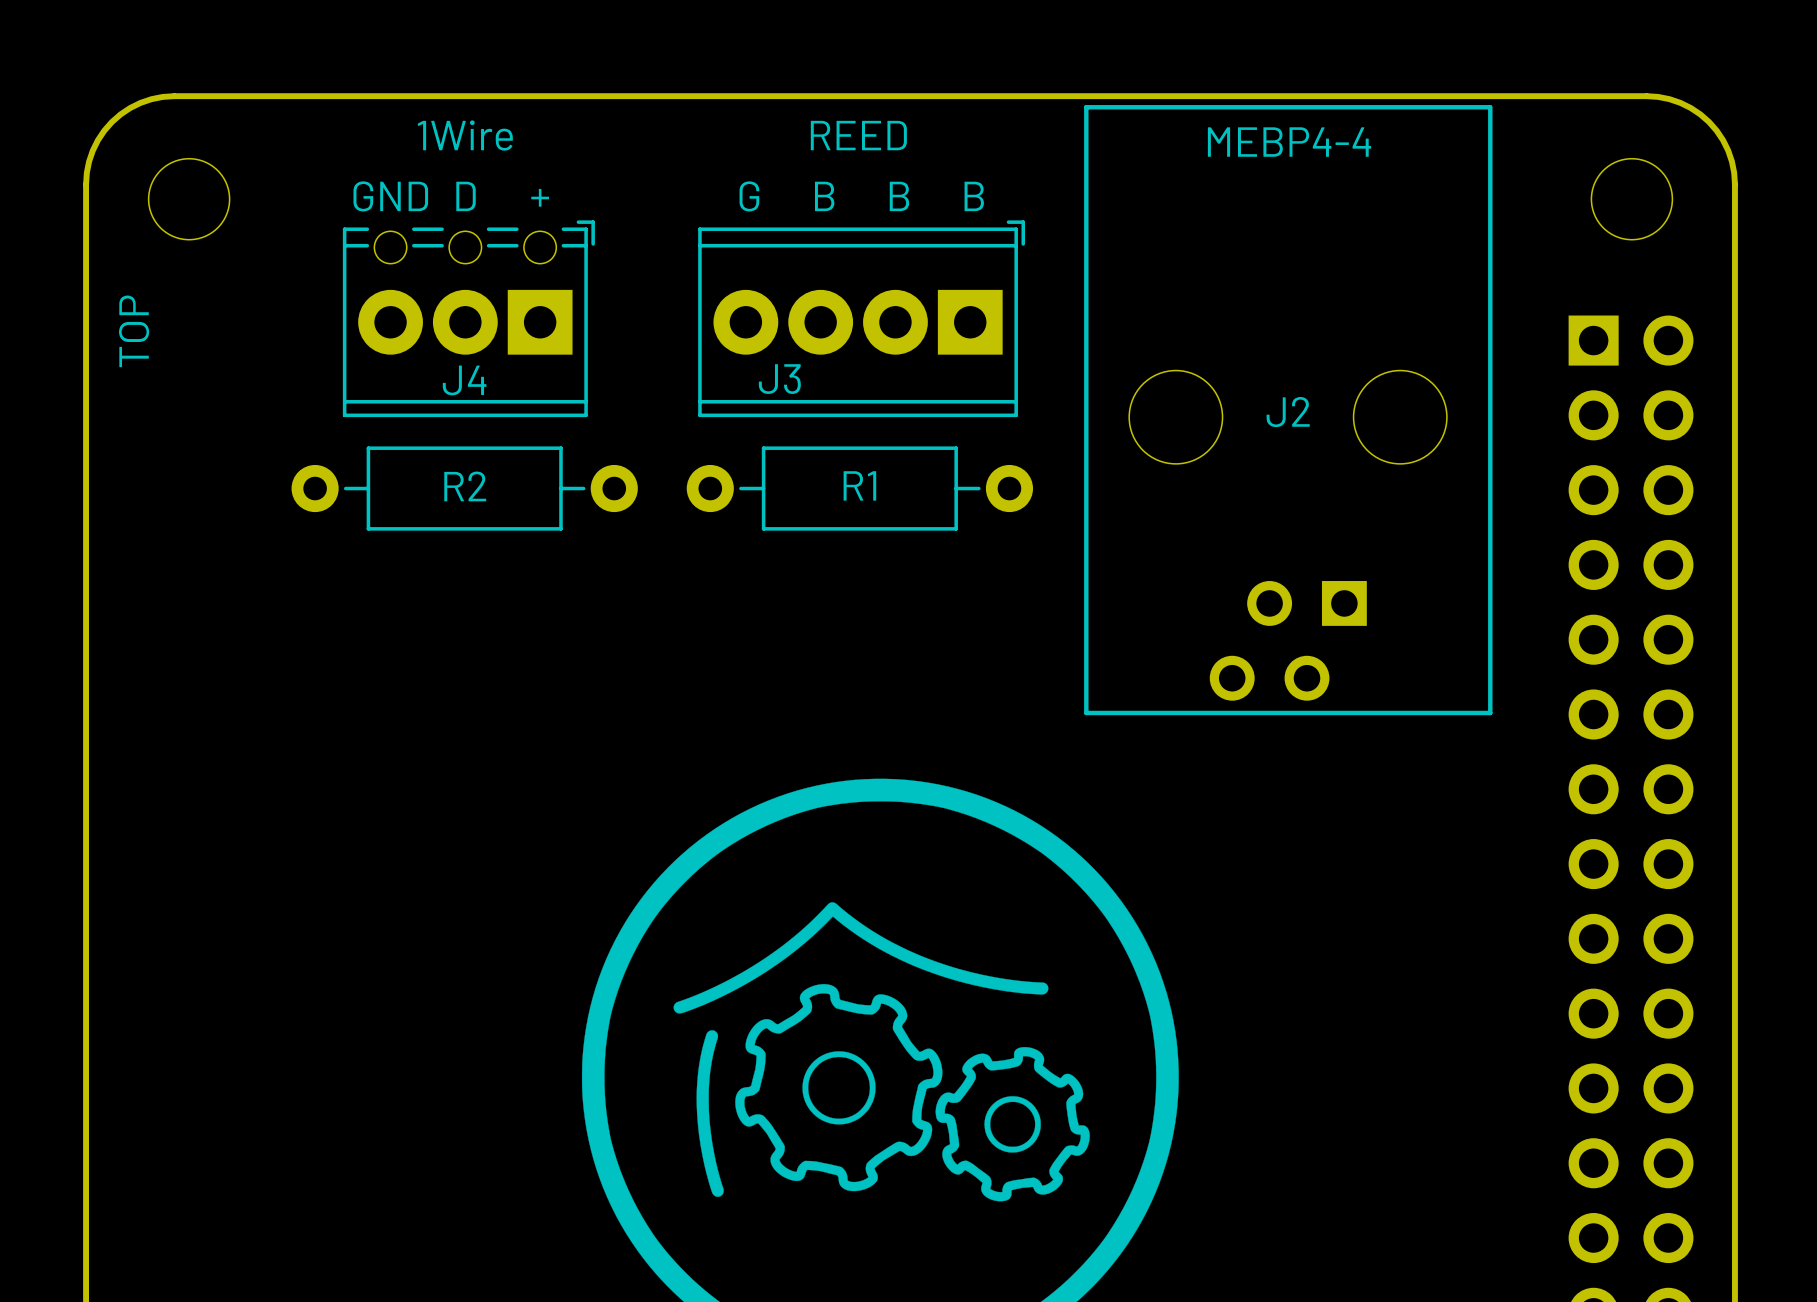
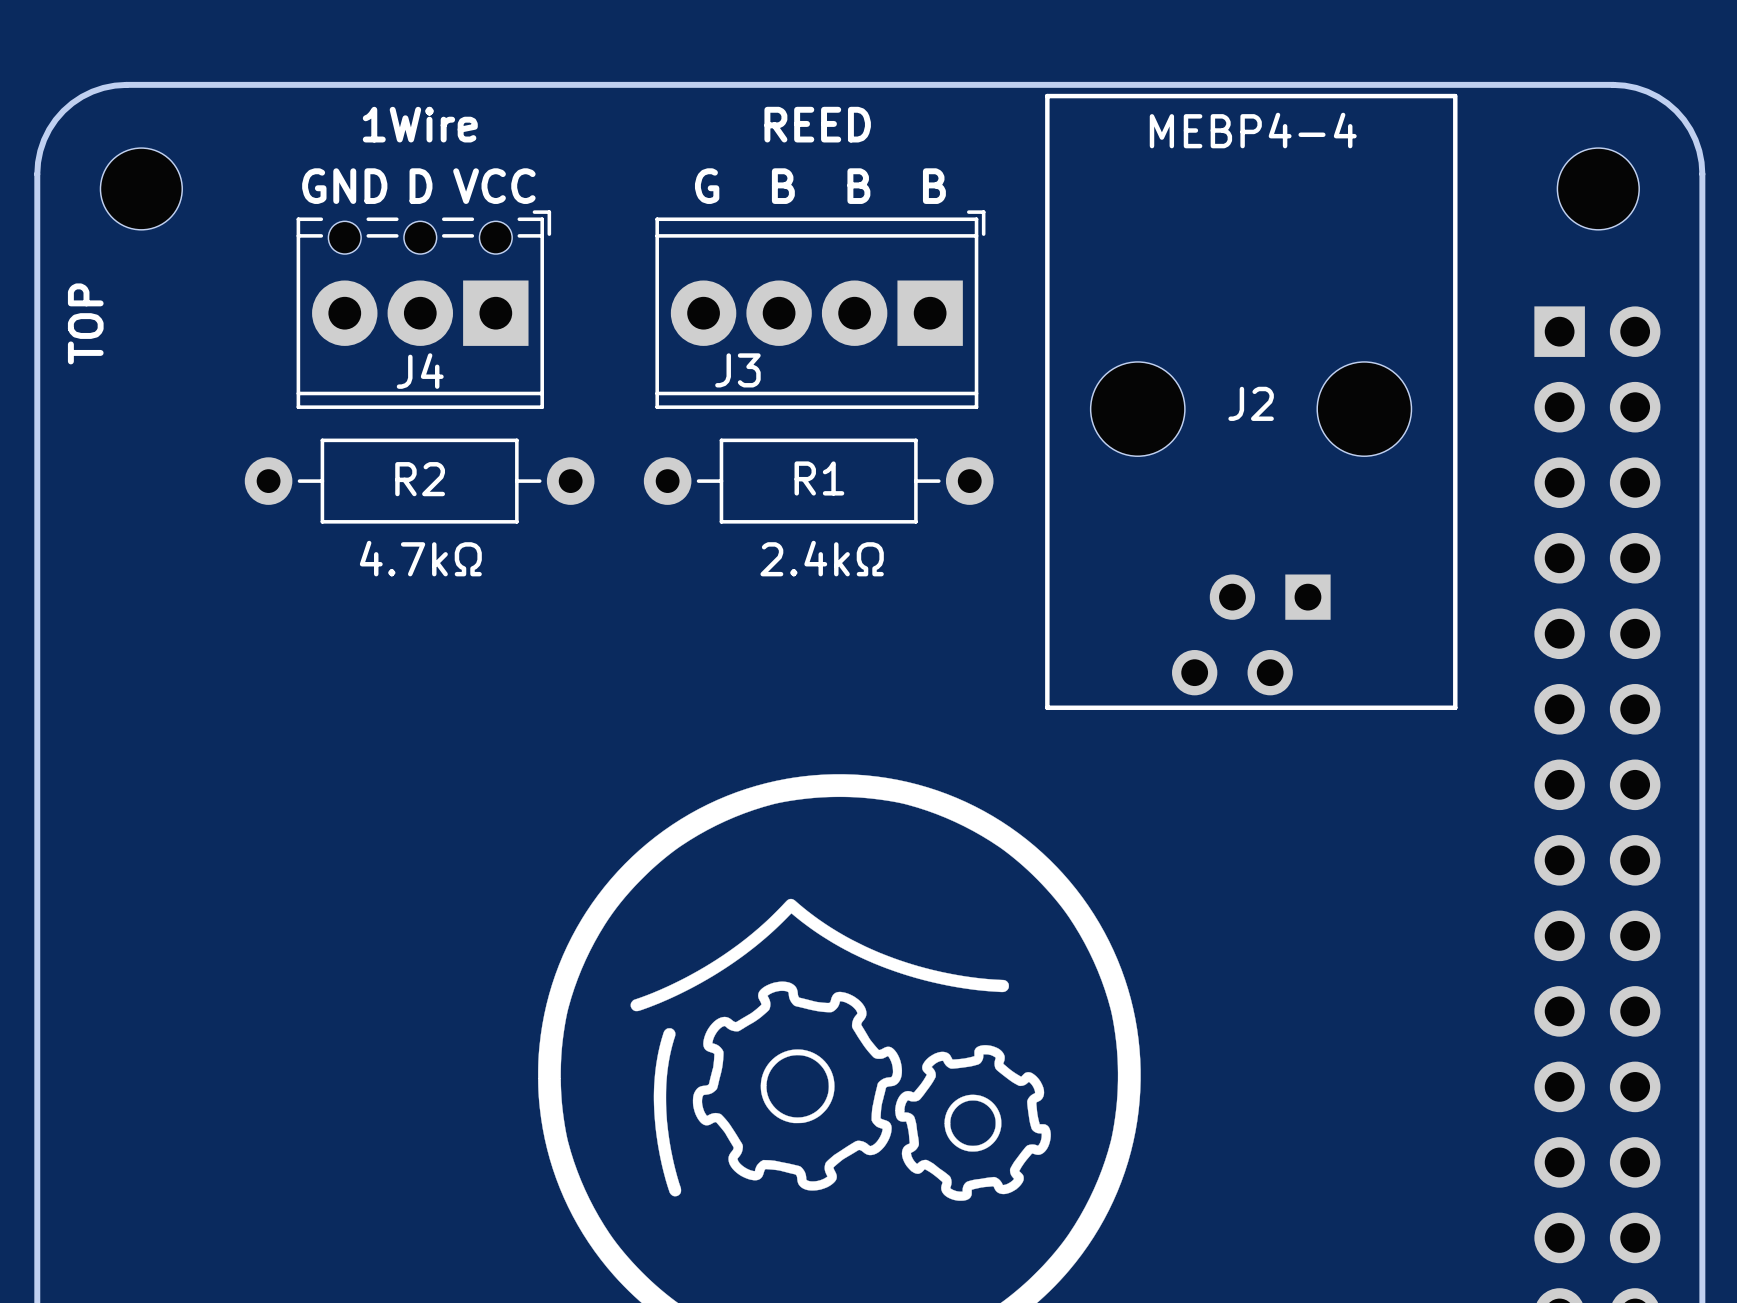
text: + (540, 197) -> VCC (494, 186)
text: none -> 4.7kΩ (420, 558)
text: none -> 2.4kΩ (822, 558)

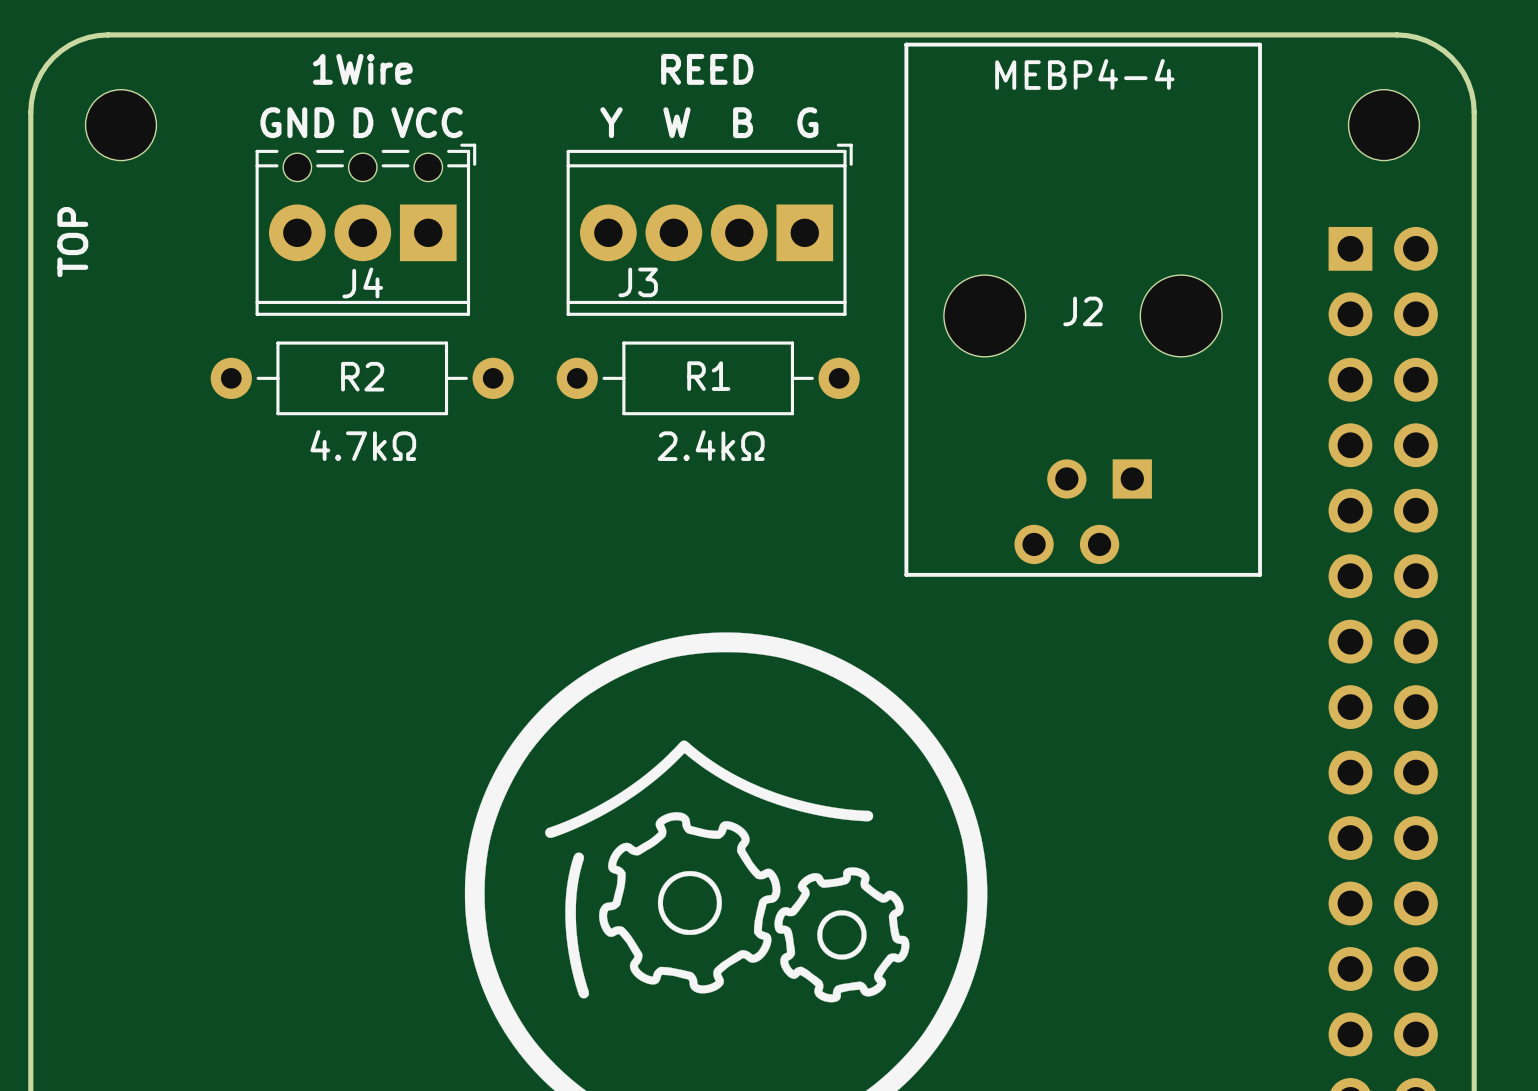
text: G (707, 186) -> Y (611, 122)
text: B (783, 186) -> W (676, 122)
text: B (934, 186) -> G (807, 122)

